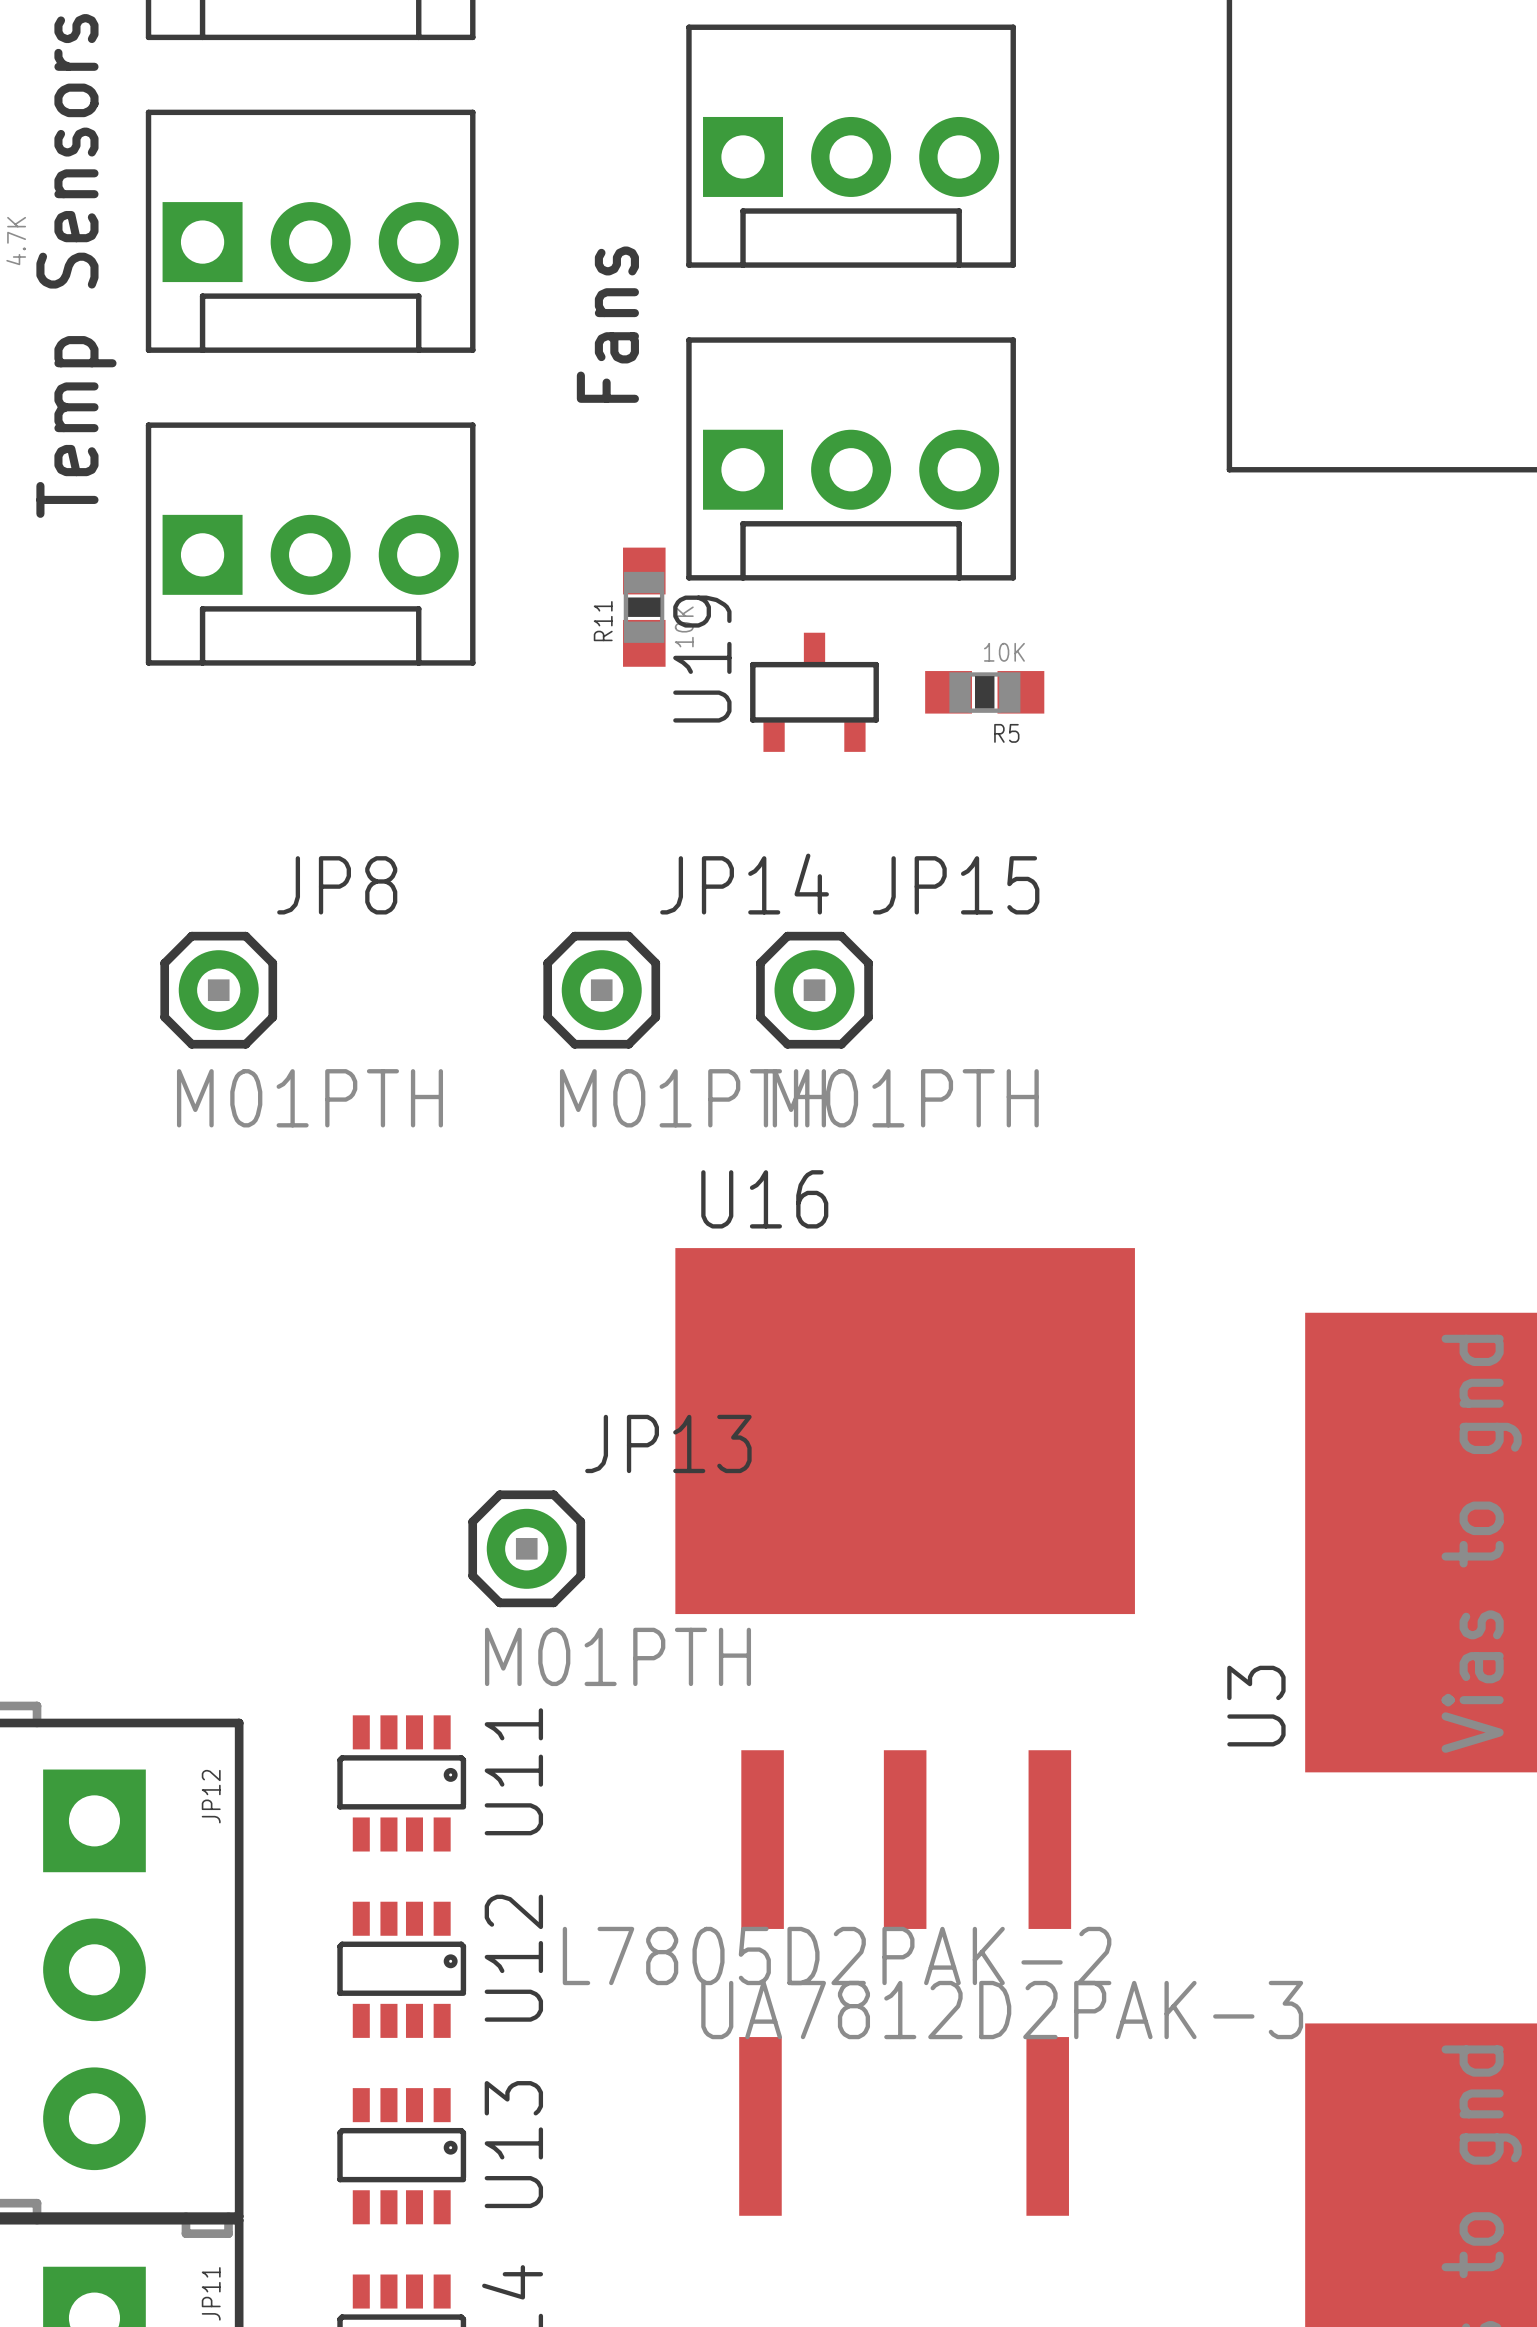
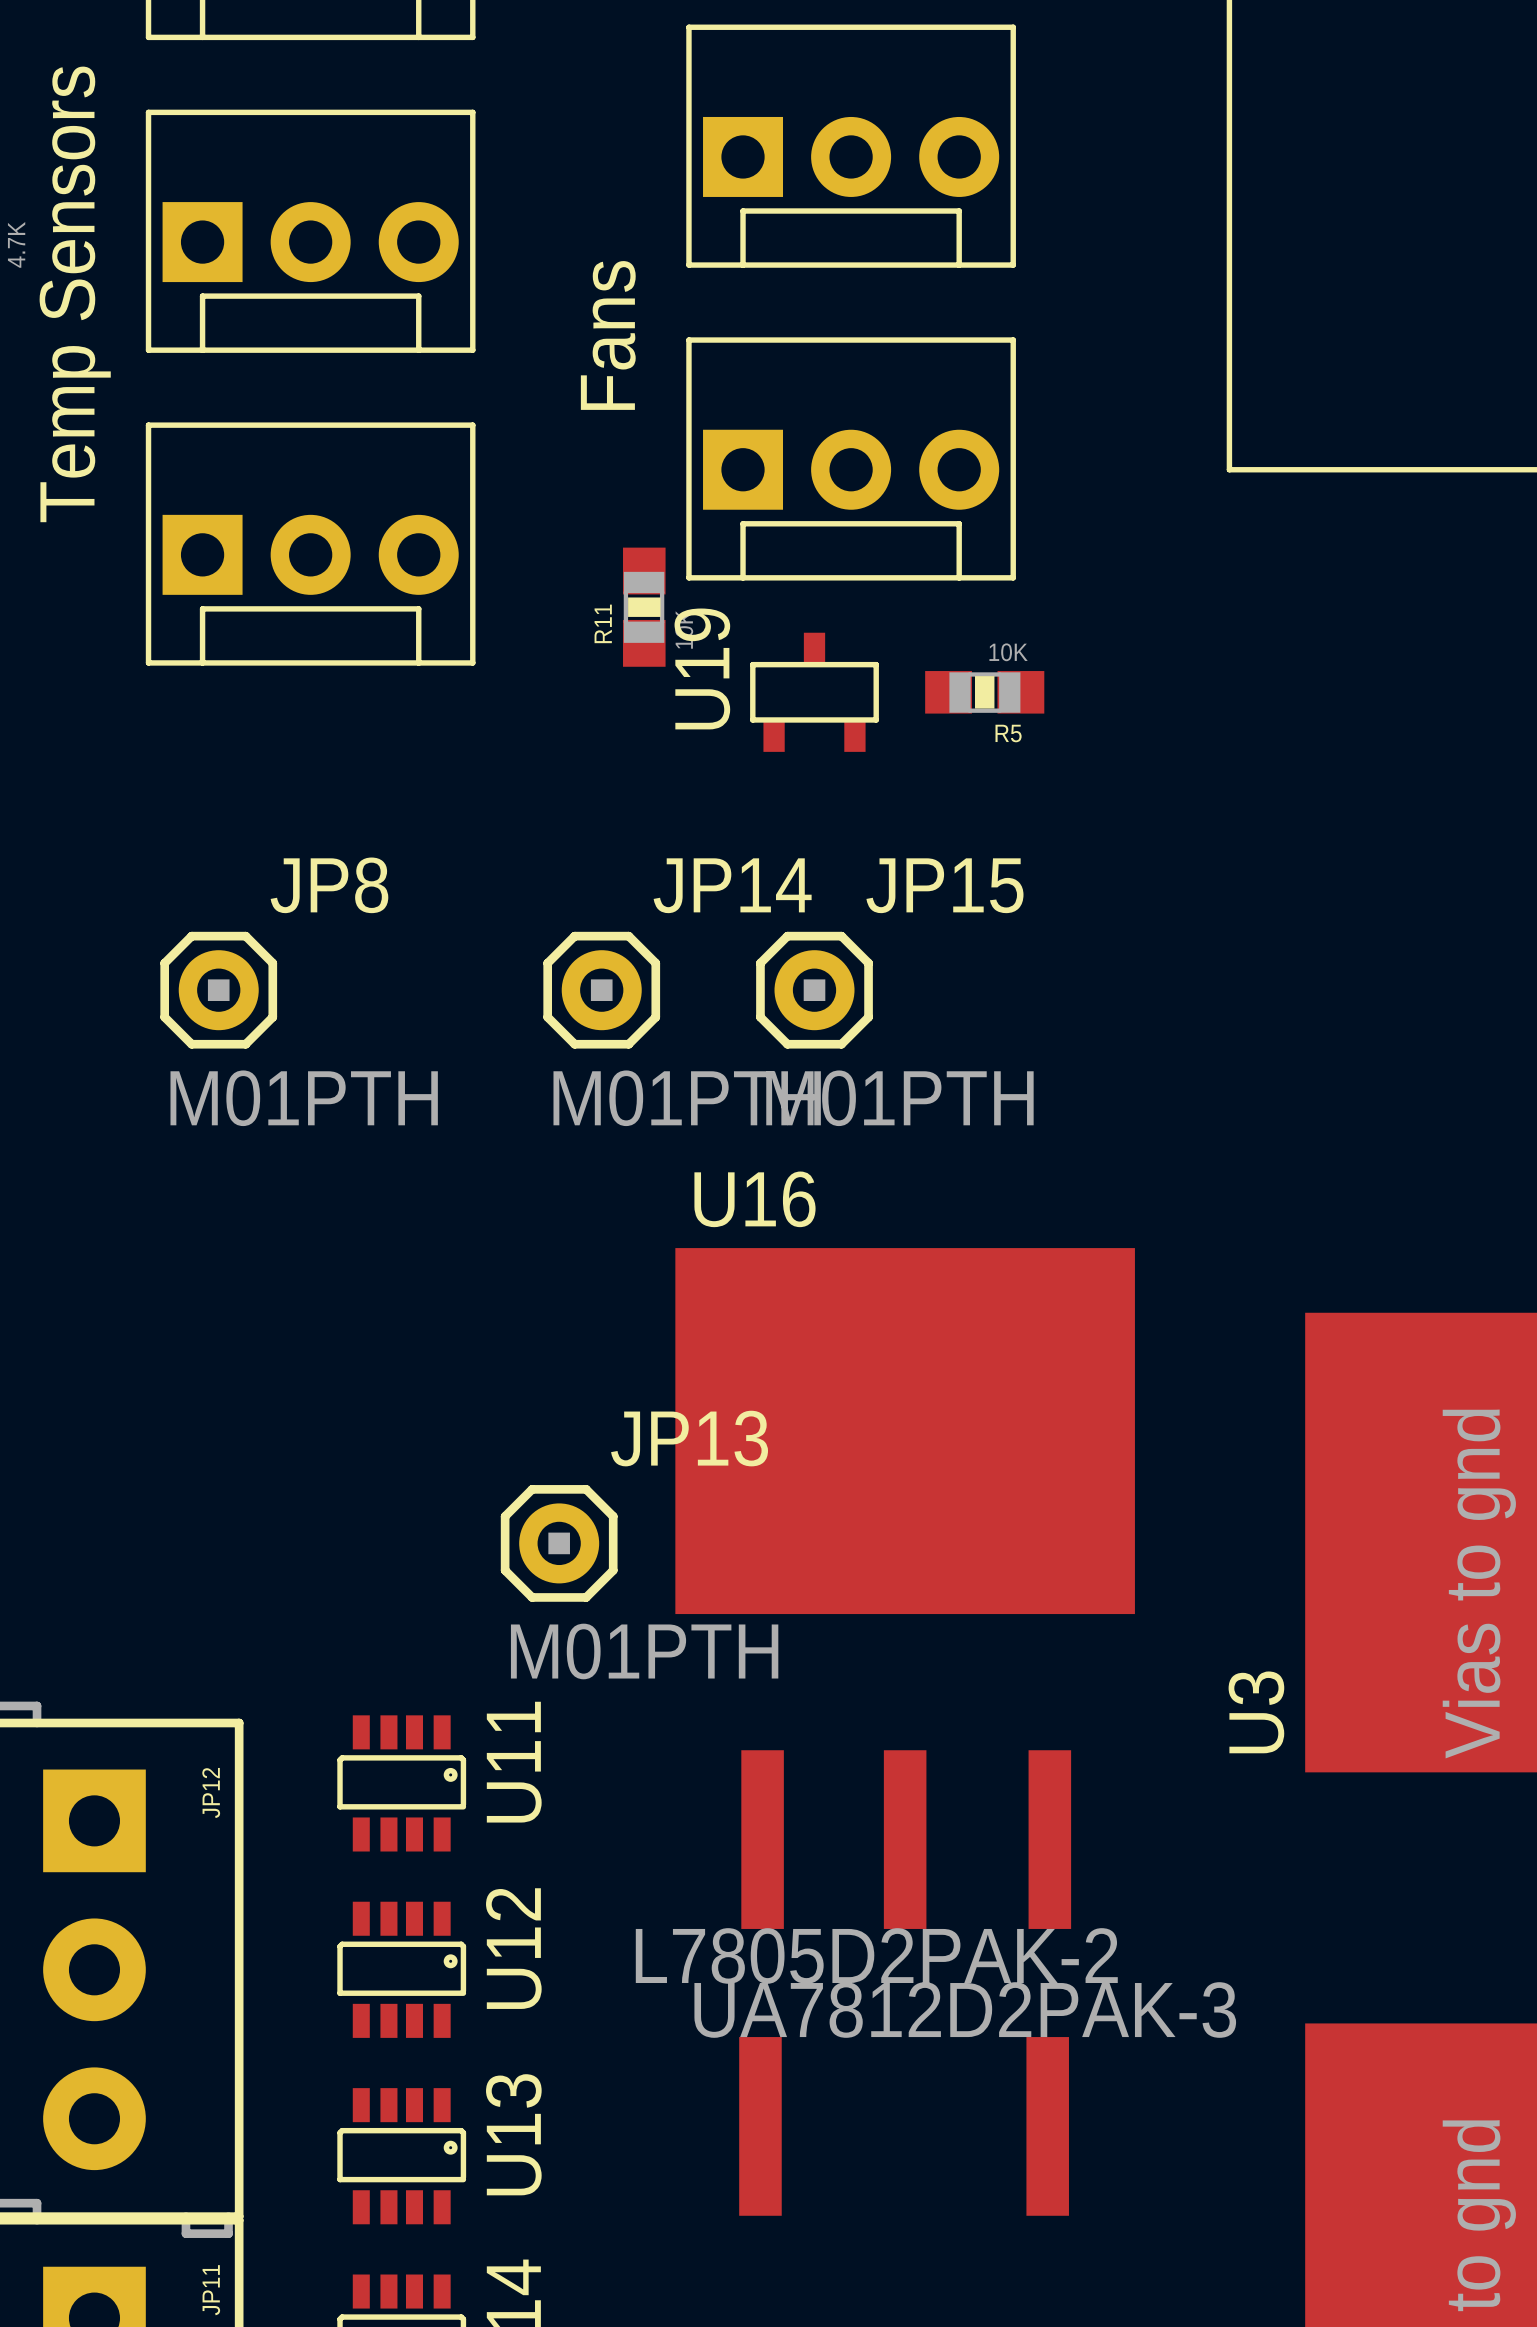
JP13 position: (526, 1548) -> (559, 1543)

